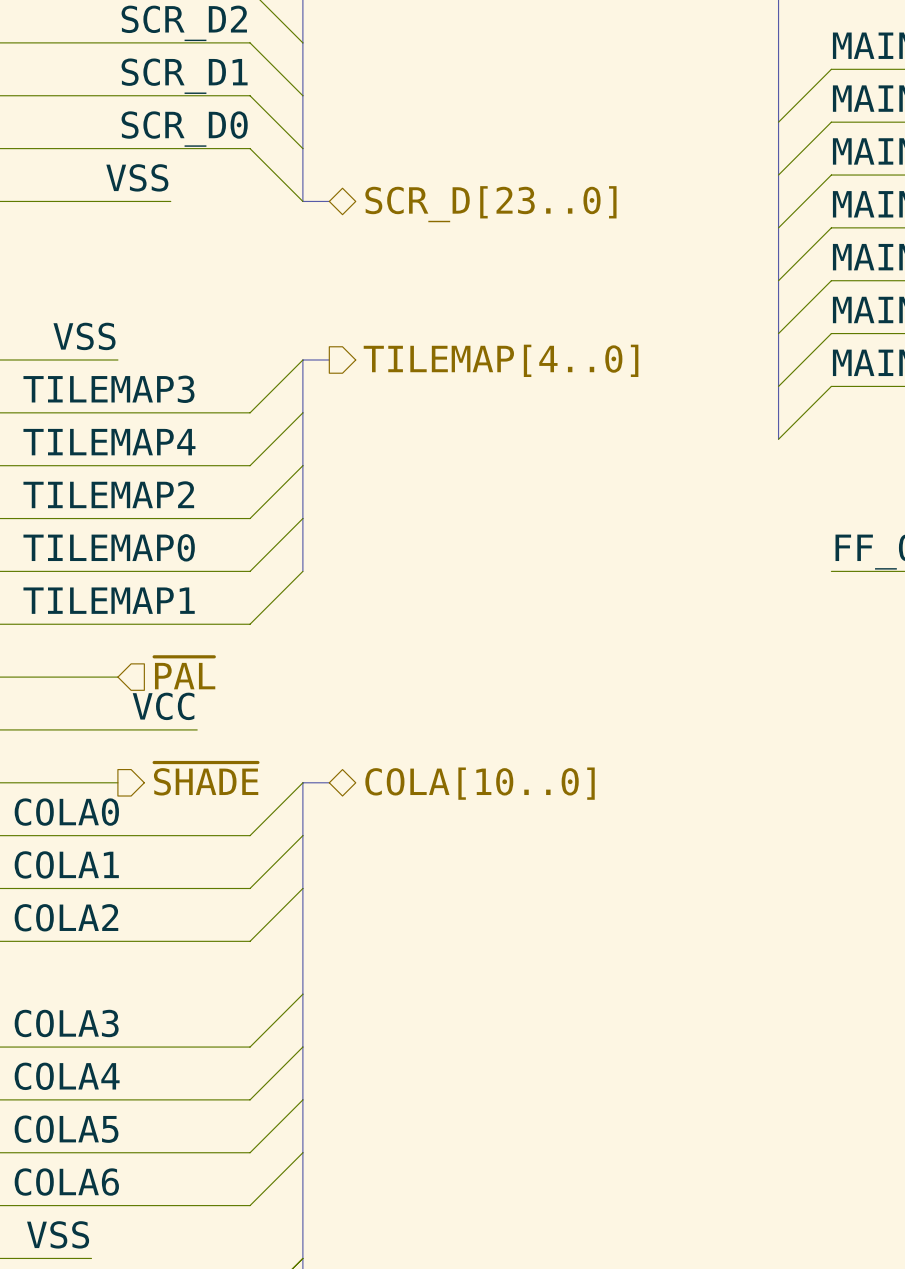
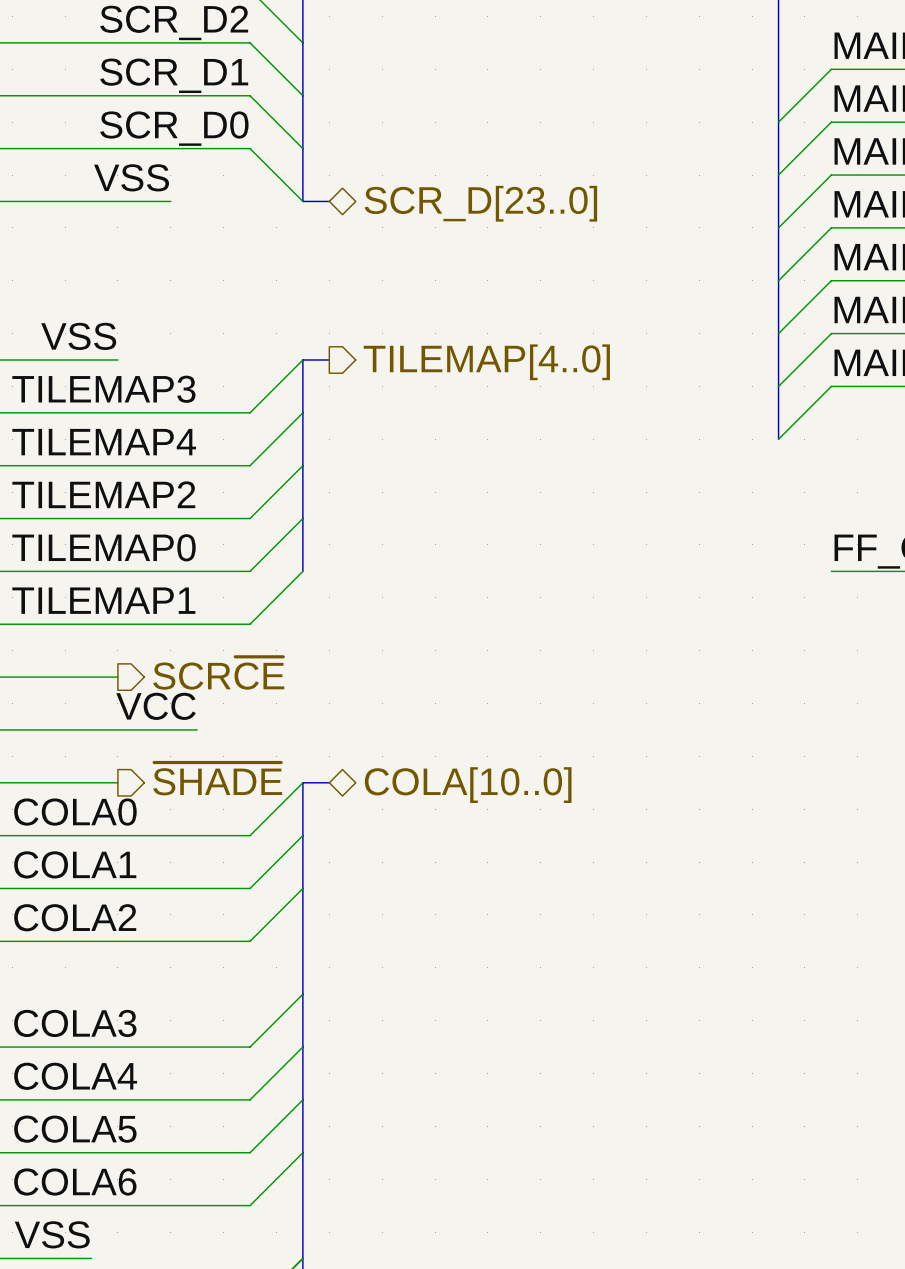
hierarchical label shape: input (184, 673) -> output (218, 673)
hierarchical label: ~{PAL} (184, 673) -> SCR~{CE} (218, 673)

